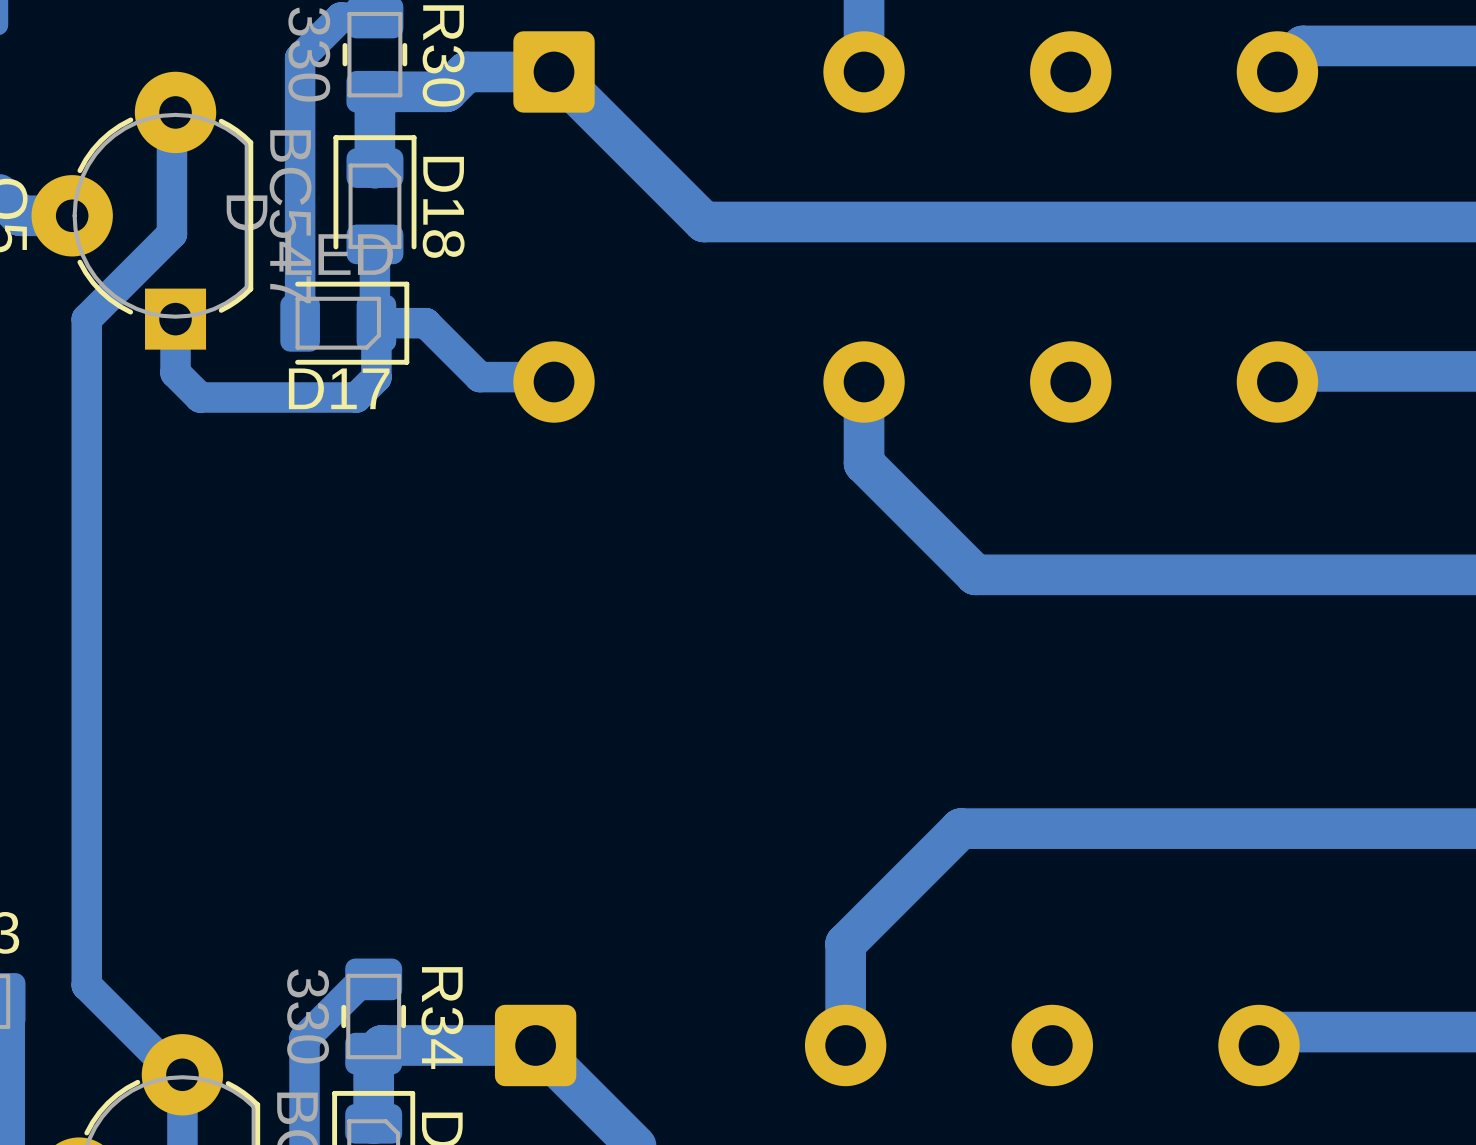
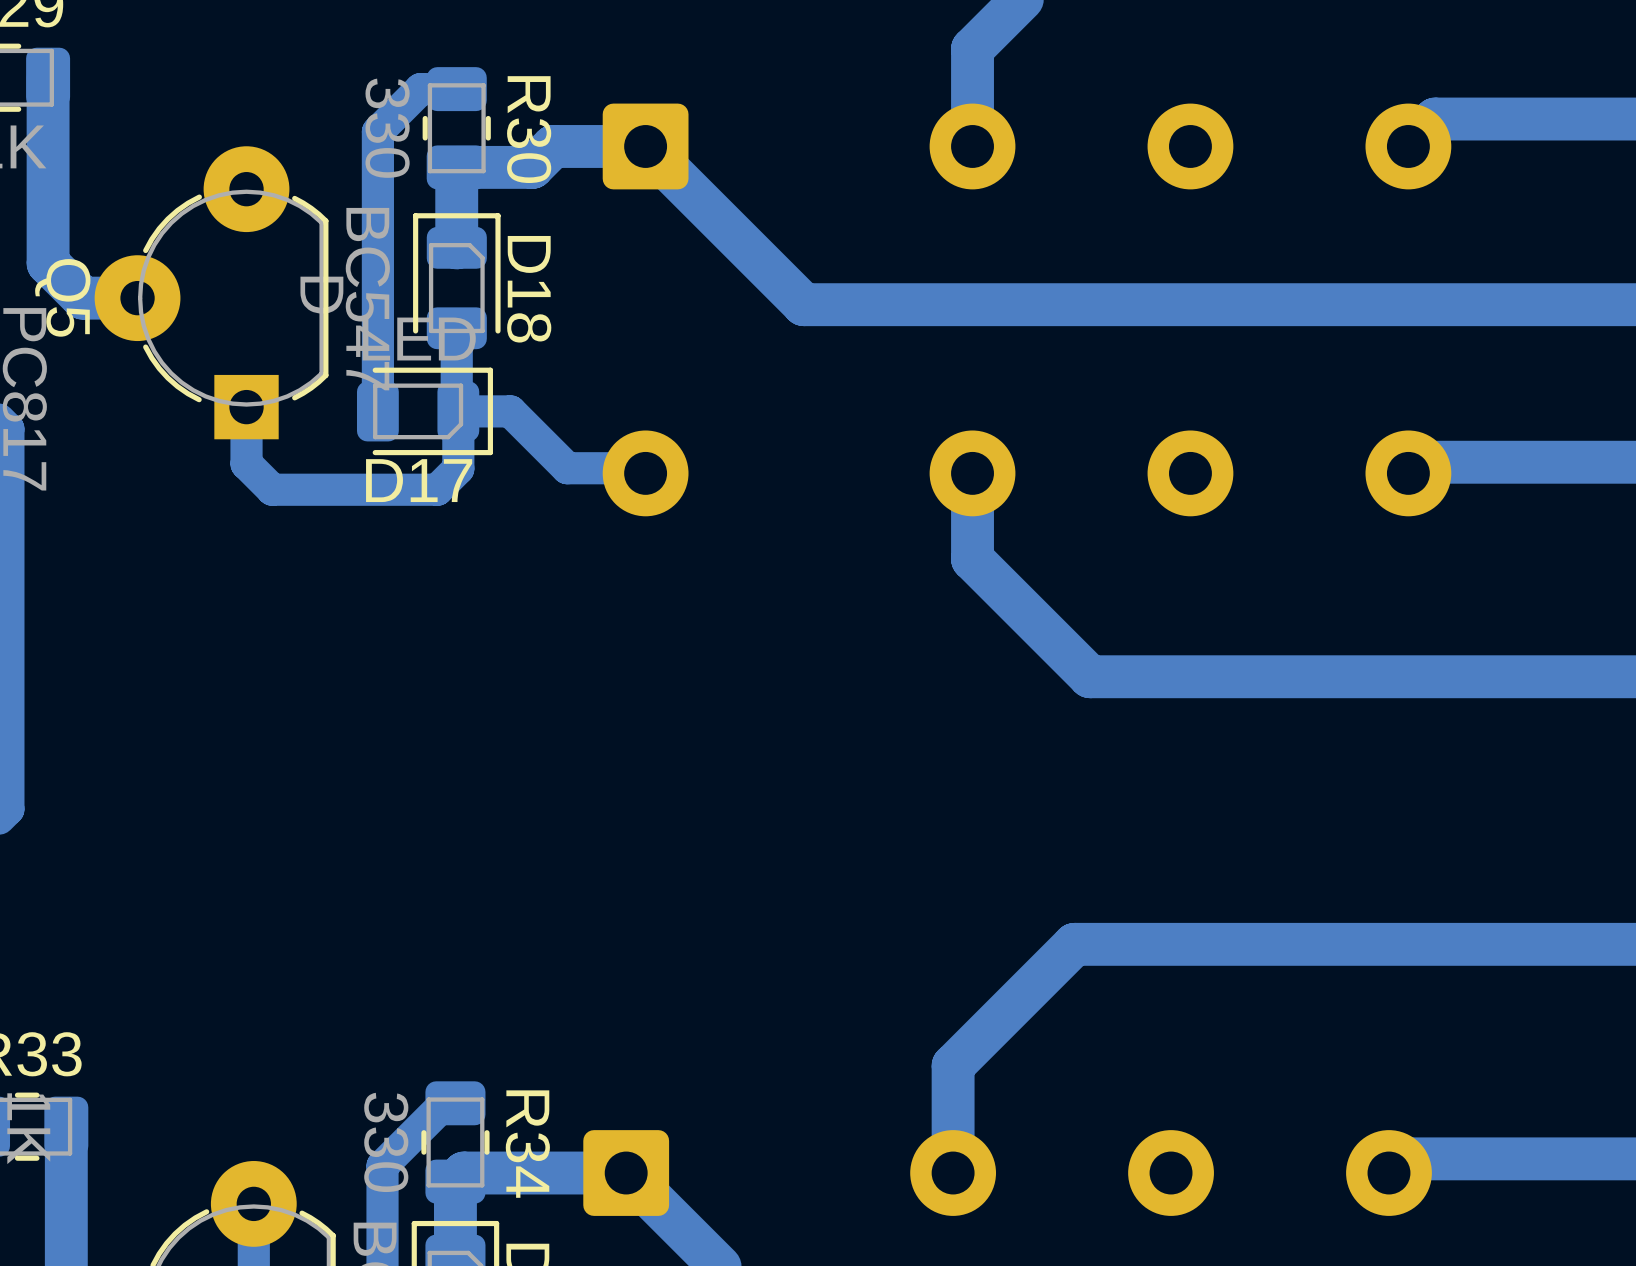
track: (171, 126) (171, 233) (86, 319) (86, 985) (176, 1074) (182, 1074) -> none

